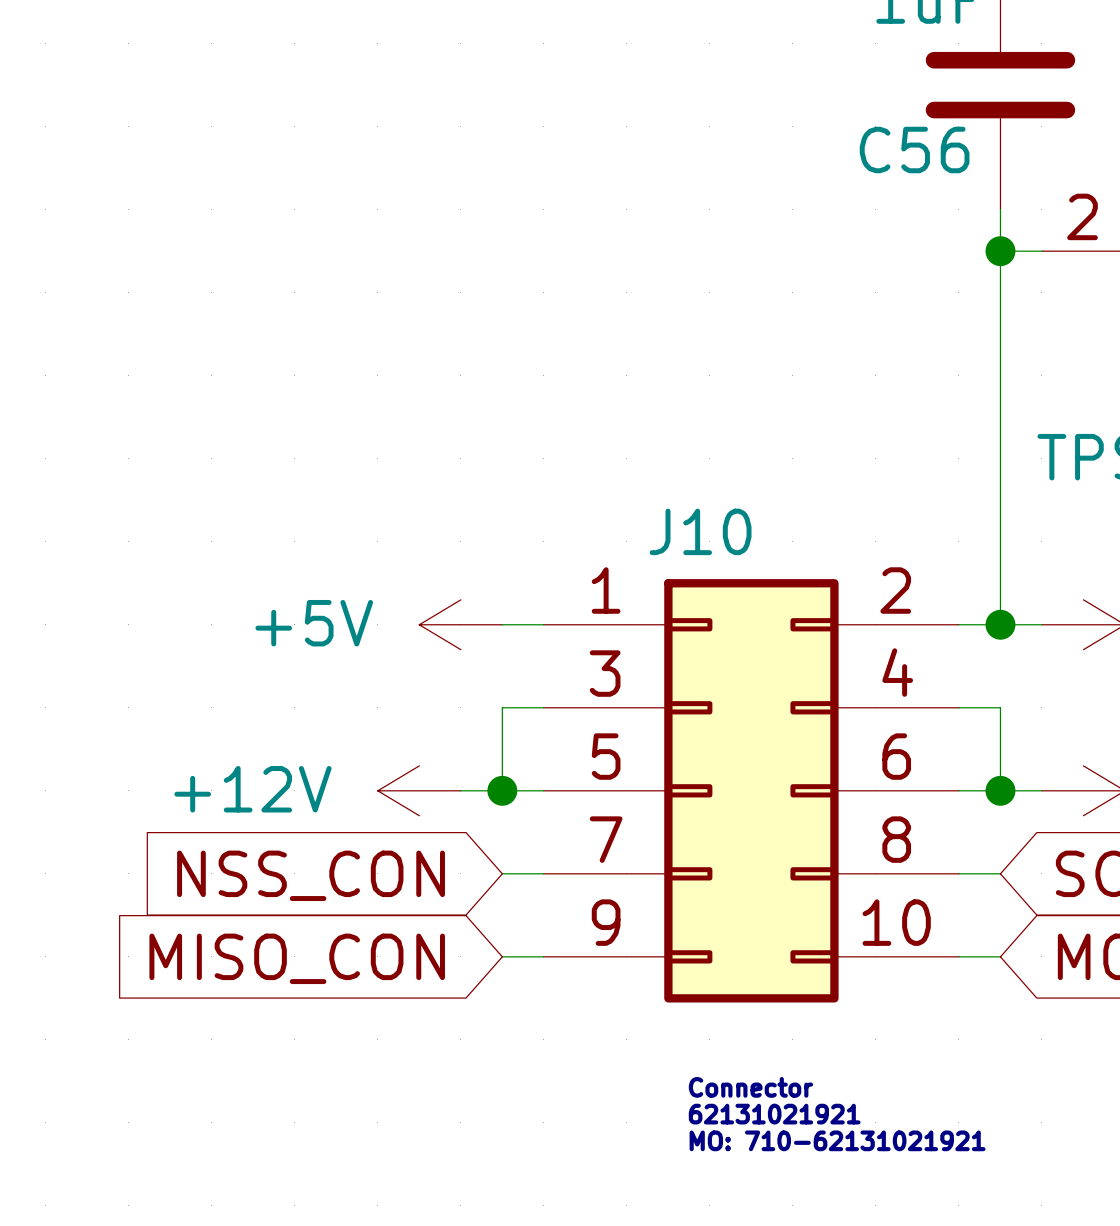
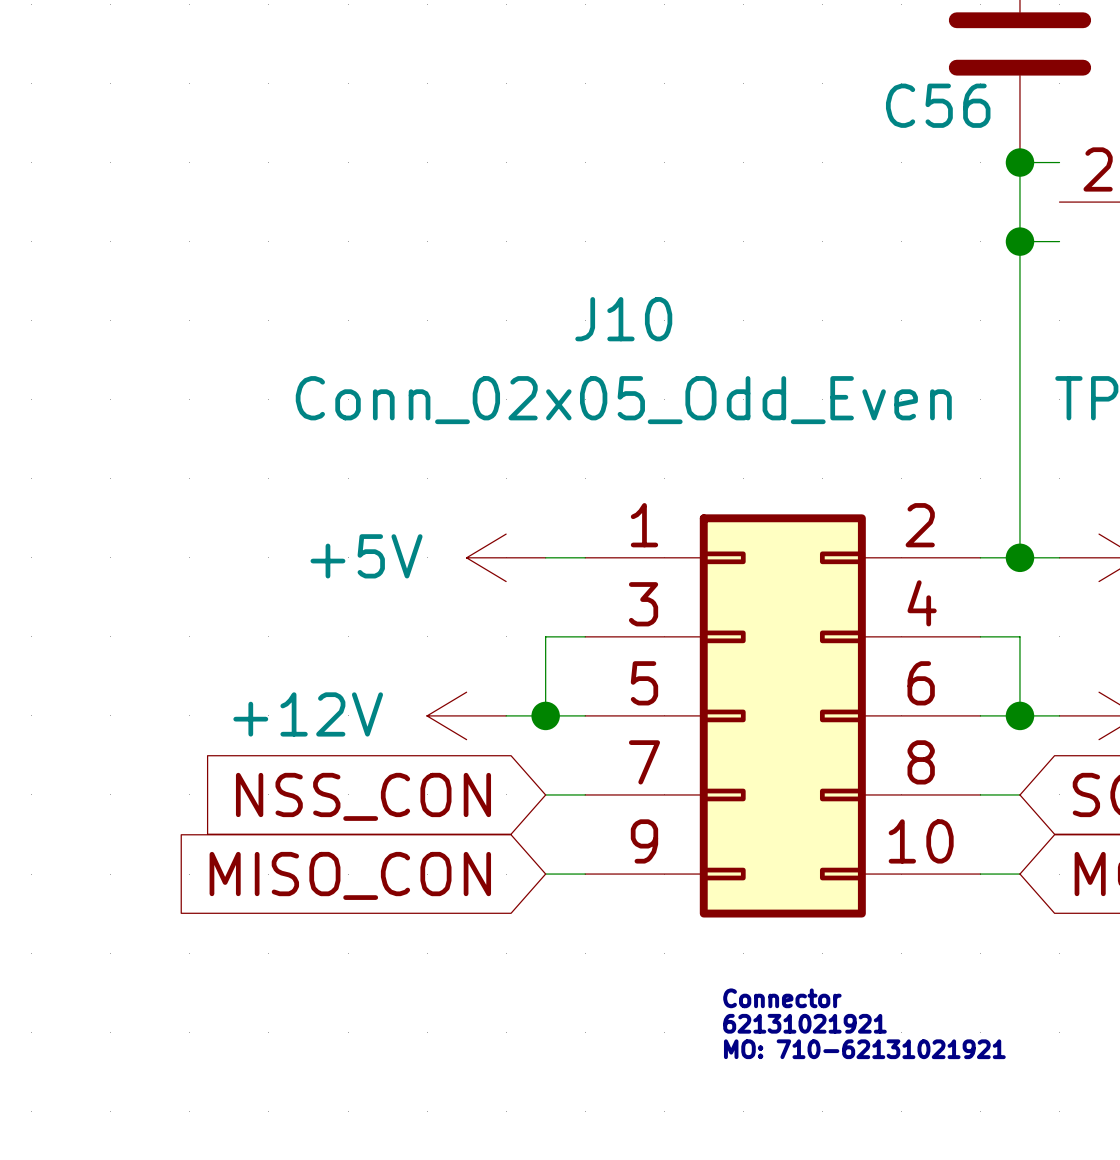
wire: none -> (1019, 162) (1059, 162)
junction: none -> (1019, 162)
wire: (1000, 251) (1041, 251) -> (1019, 241) (1059, 241)
junction: (1000, 251) -> none
junction: none -> (1019, 241)
J10 value: none -> Conn_02x05_Odd_Even (623, 400)
J10 name position: J10 (700, 531) -> J10 (623, 319)

